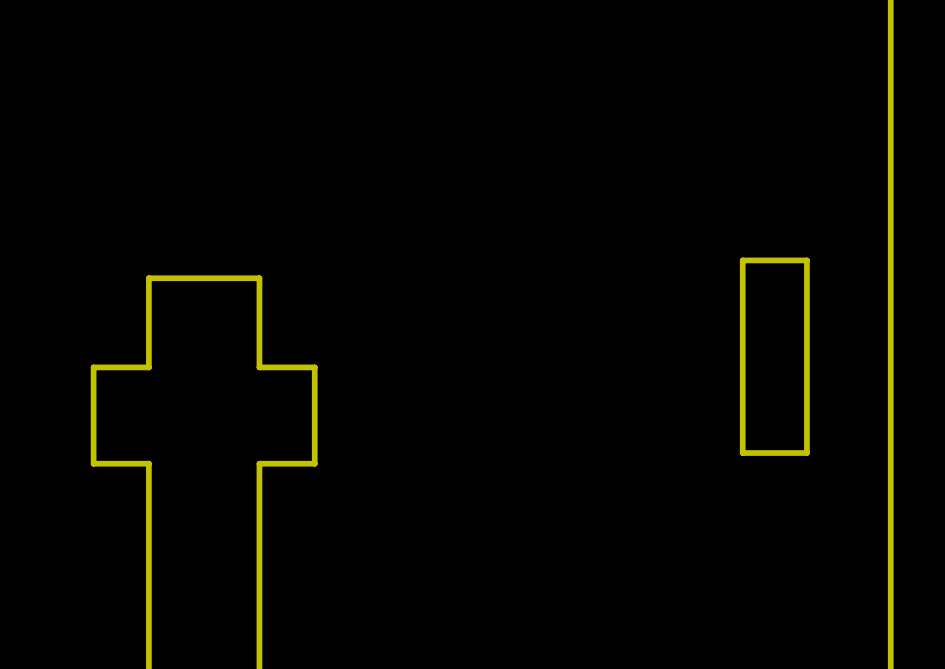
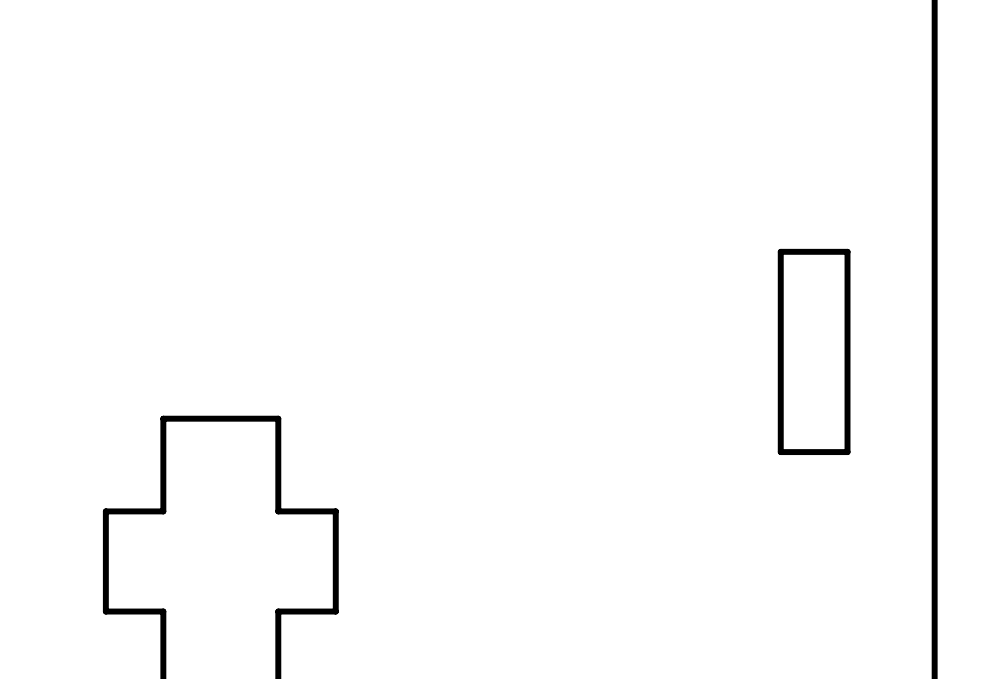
board edge: (148, 463) (93, 463) (93, 367) (148, 367) (148, 278) (259, 278) (259, 367) (314, 367) (314, 463) (259, 463) -> (163, 463) (163, 418) (278, 418) (278, 463)
board edge: (148, 510) (148, 606) -> (163, 511) (105, 511) (105, 611) (163, 611)
board edge: (259, 510) (259, 606) -> (278, 511) (335, 511) (335, 611) (278, 611)

